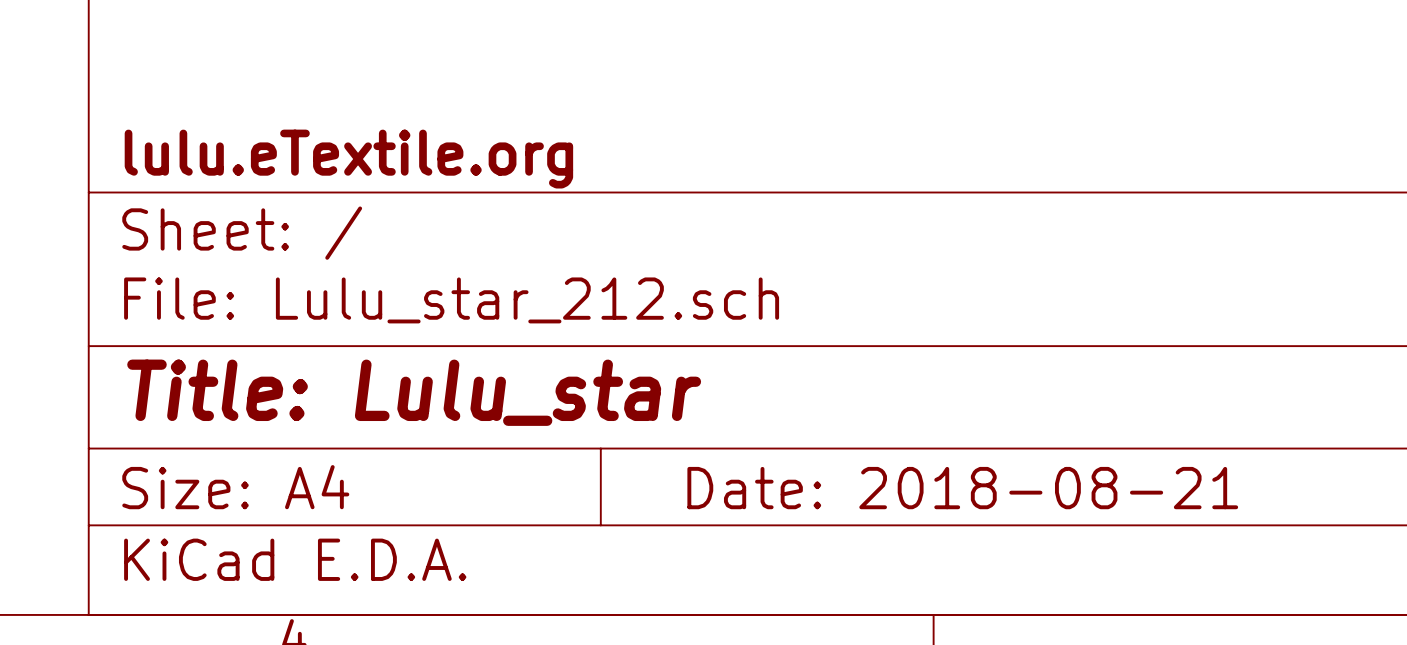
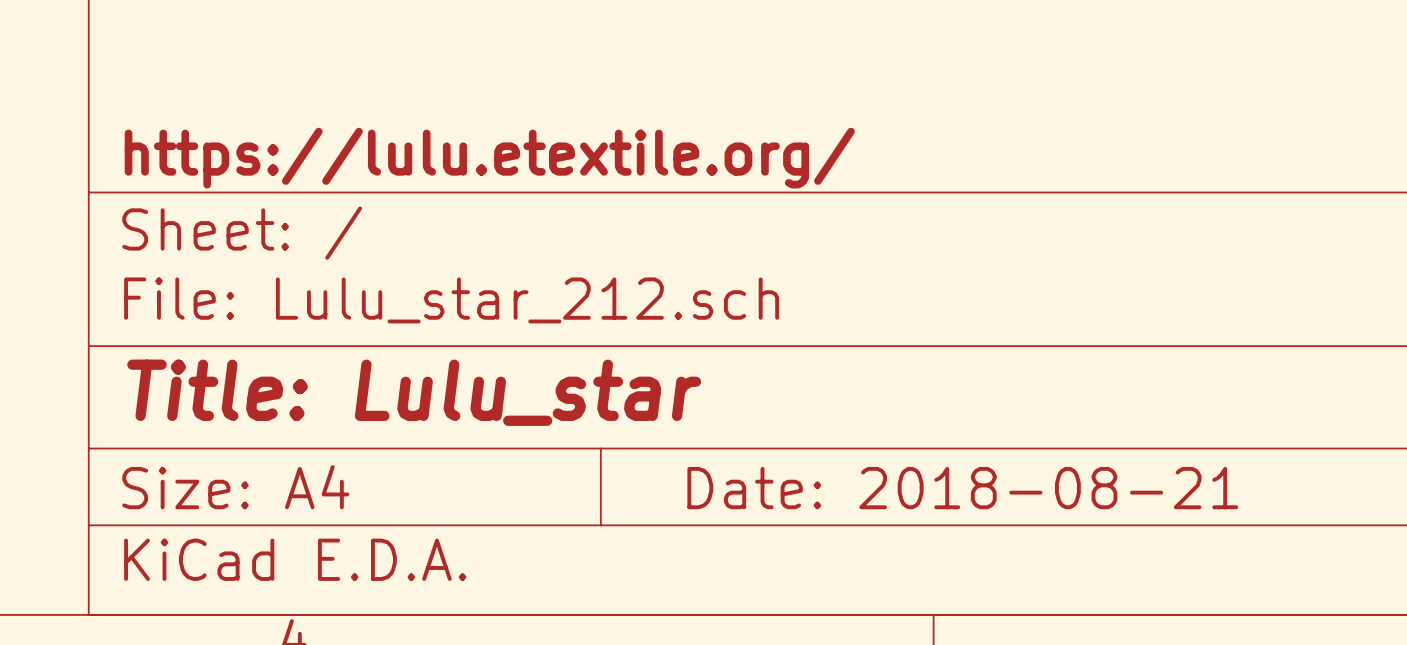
title block: lulu.eTextile.org (348, 159) -> https://lulu.etextile.org/ (489, 158)

